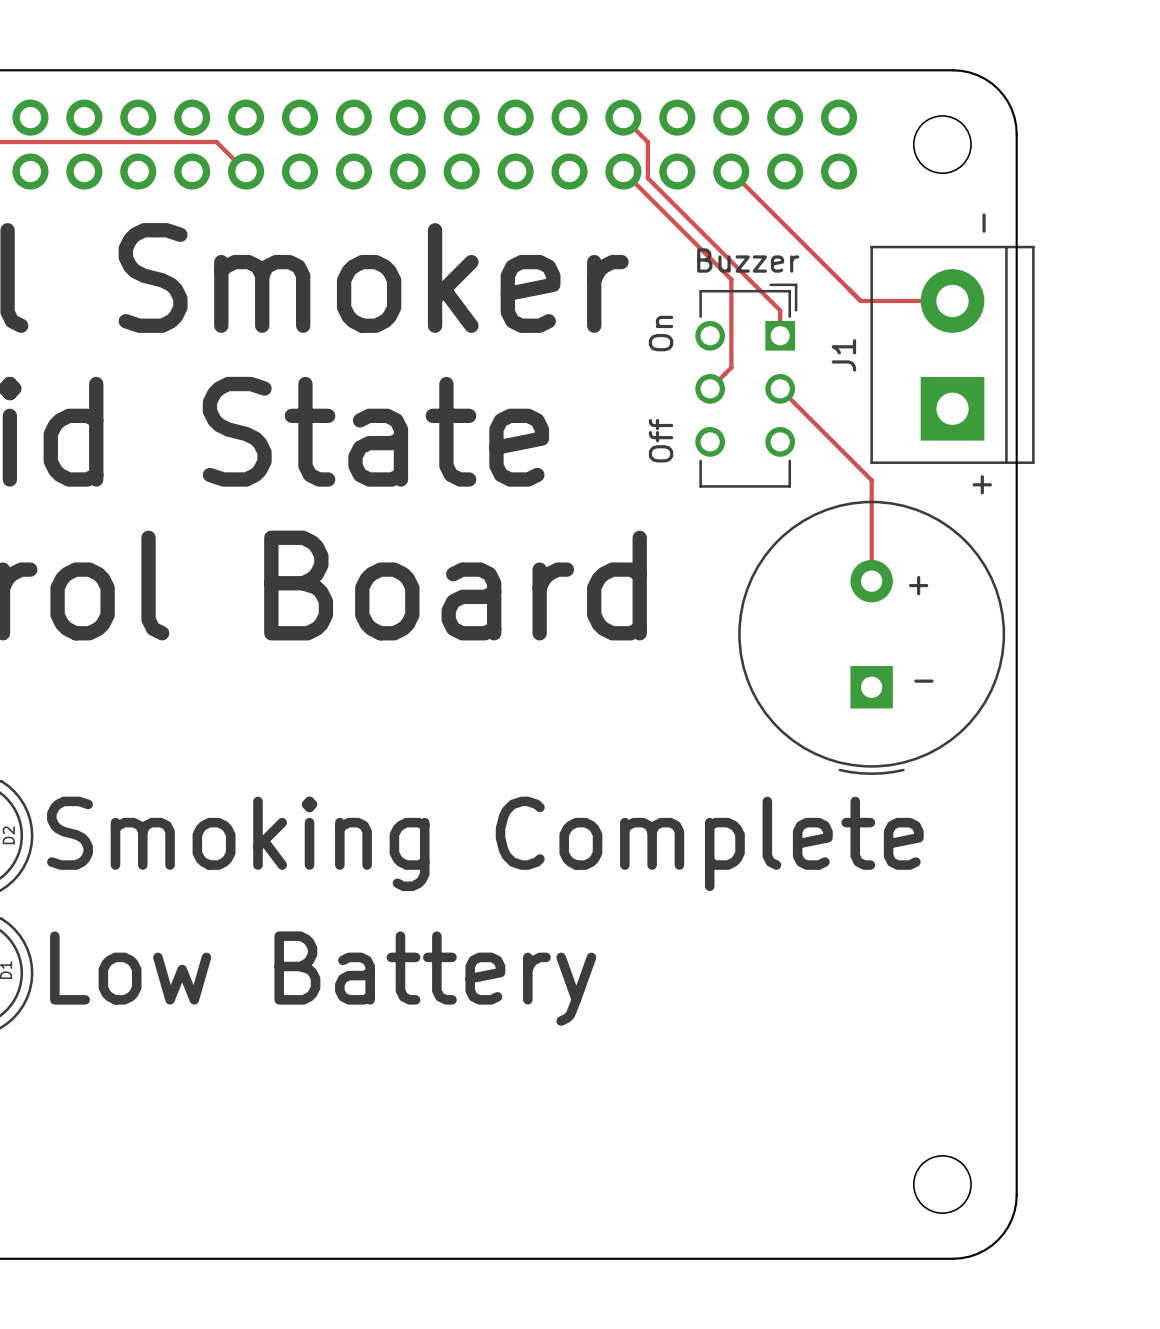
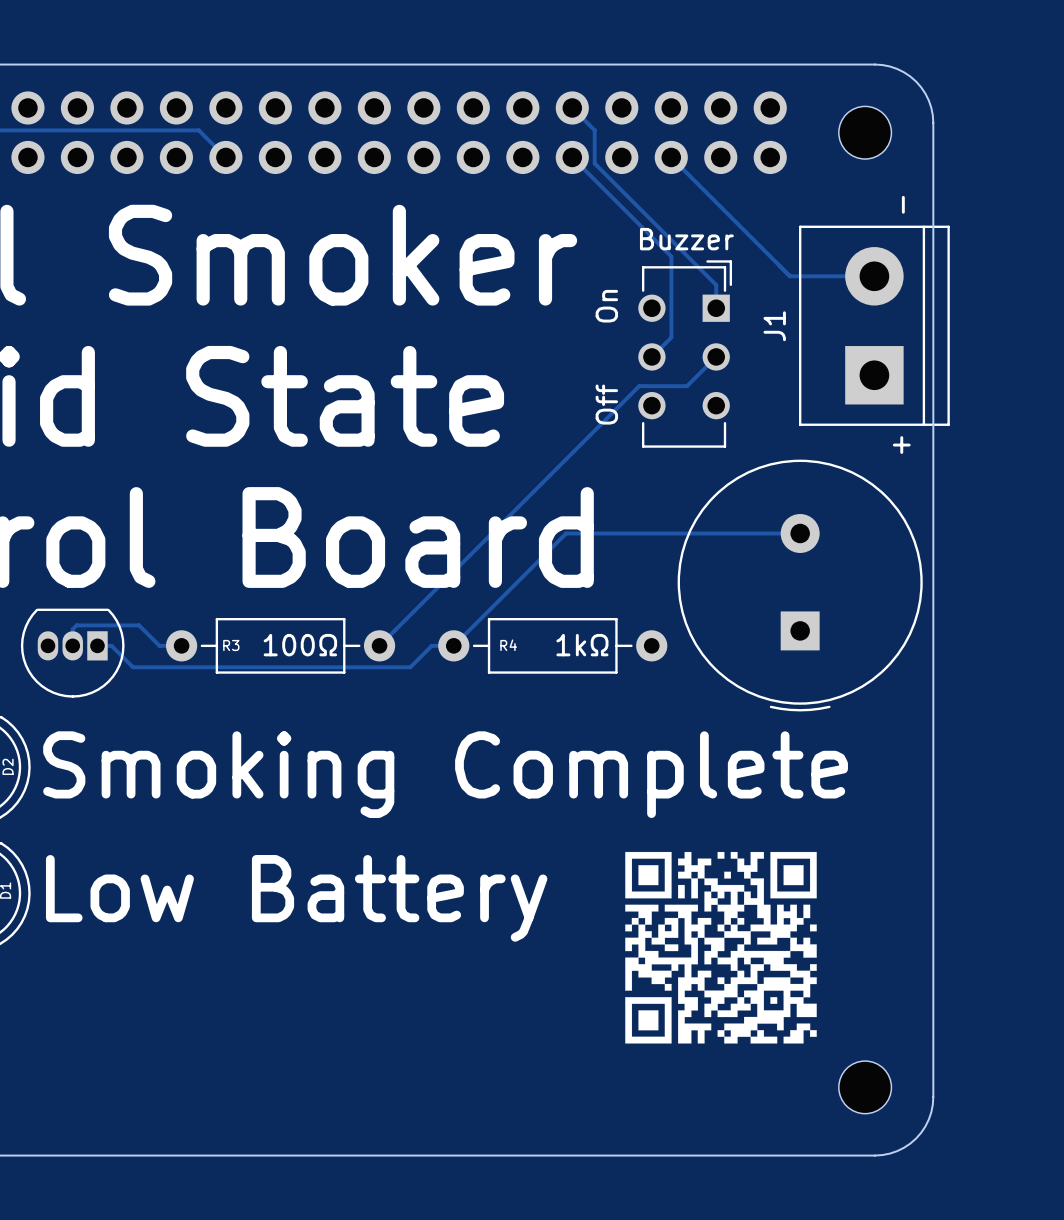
track: (780, 388) (871, 480) (871, 581) -> (716, 356) (687, 386) (639, 386) (379, 645)
track: none -> (800, 533) (566, 533) (453, 645) (431, 645) (410, 667) (133, 667) (111, 645) (97, 645)
text: + (918, 585) -> none
text: - (923, 681) -> none
track: none -> (72, 645) (72, 629) (76, 625) (139, 625) (159, 645) (181, 645)
R3: none -> 100Ω (280, 645)
R4: none -> 1kΩ (552, 645)
part: none -> (72, 653)
drawing: none -> [625, 851, 817, 1044]

